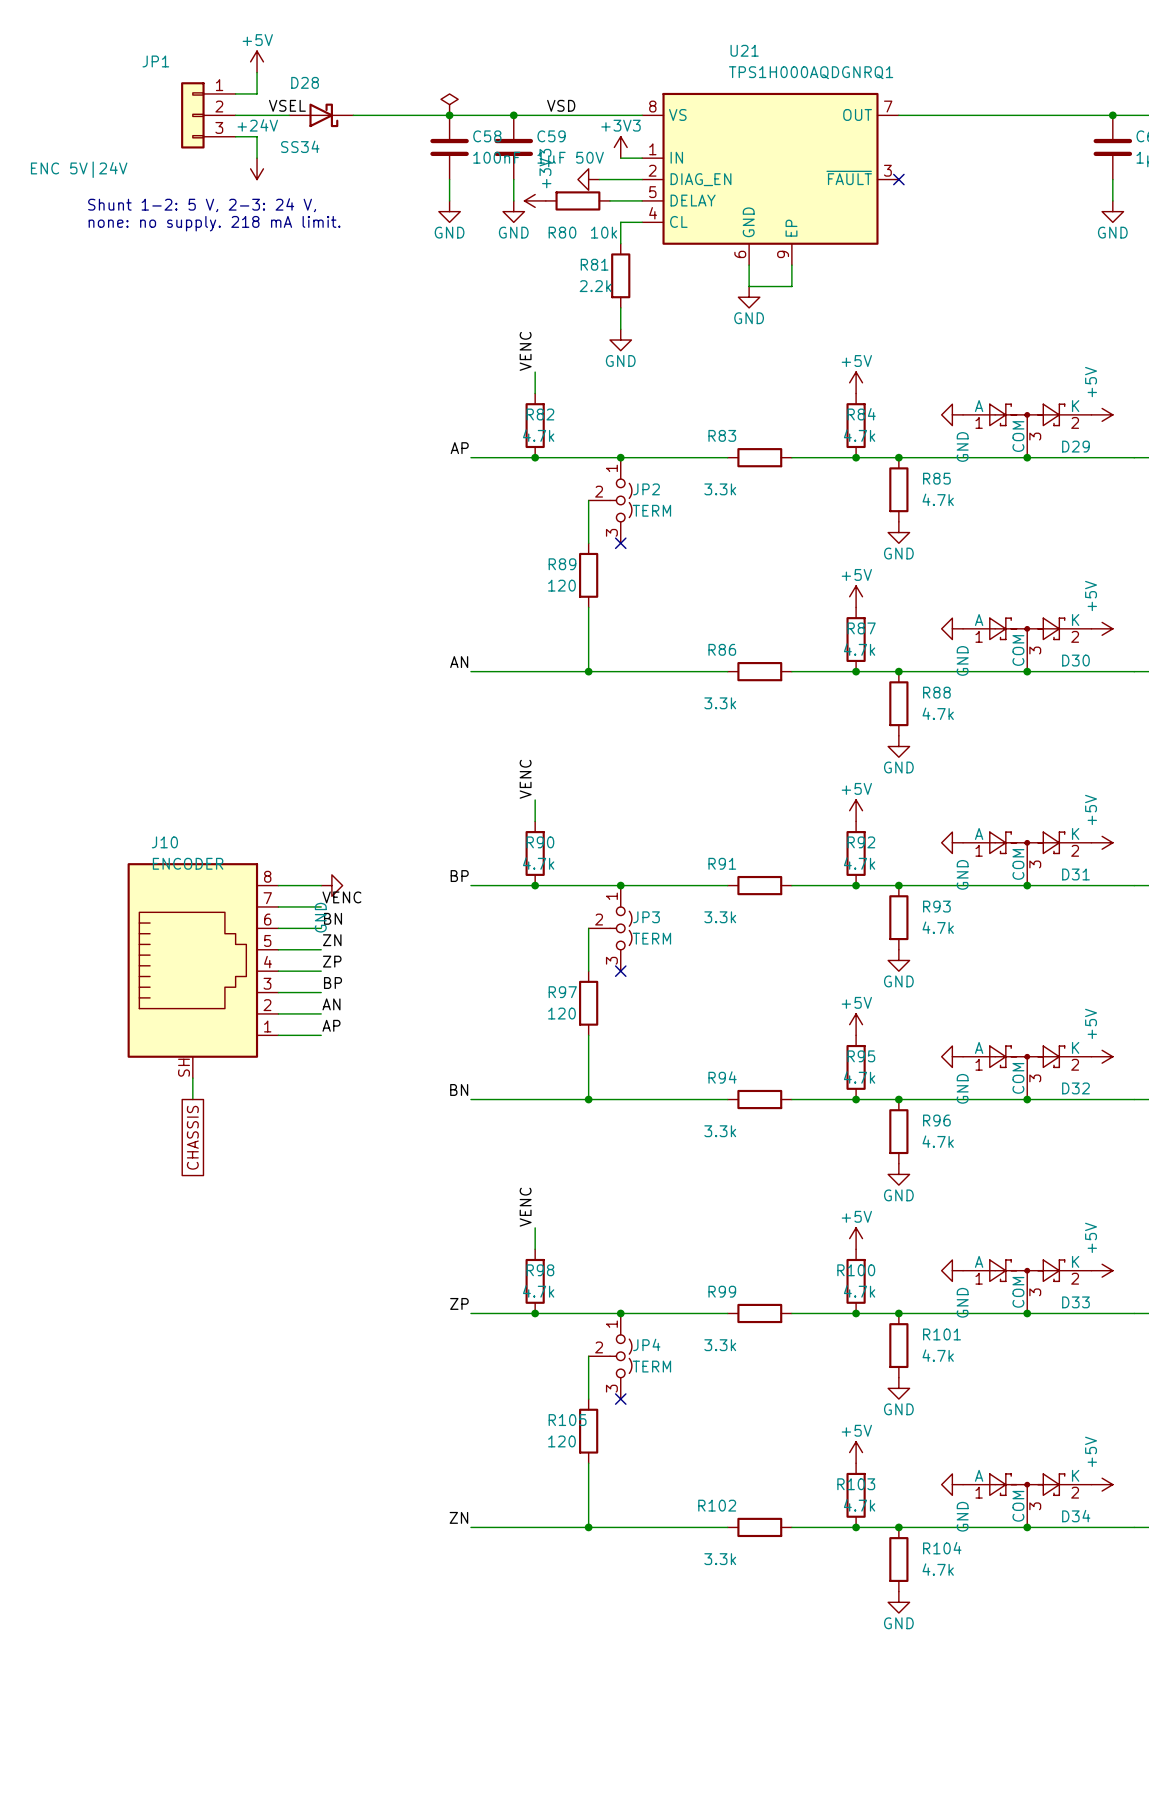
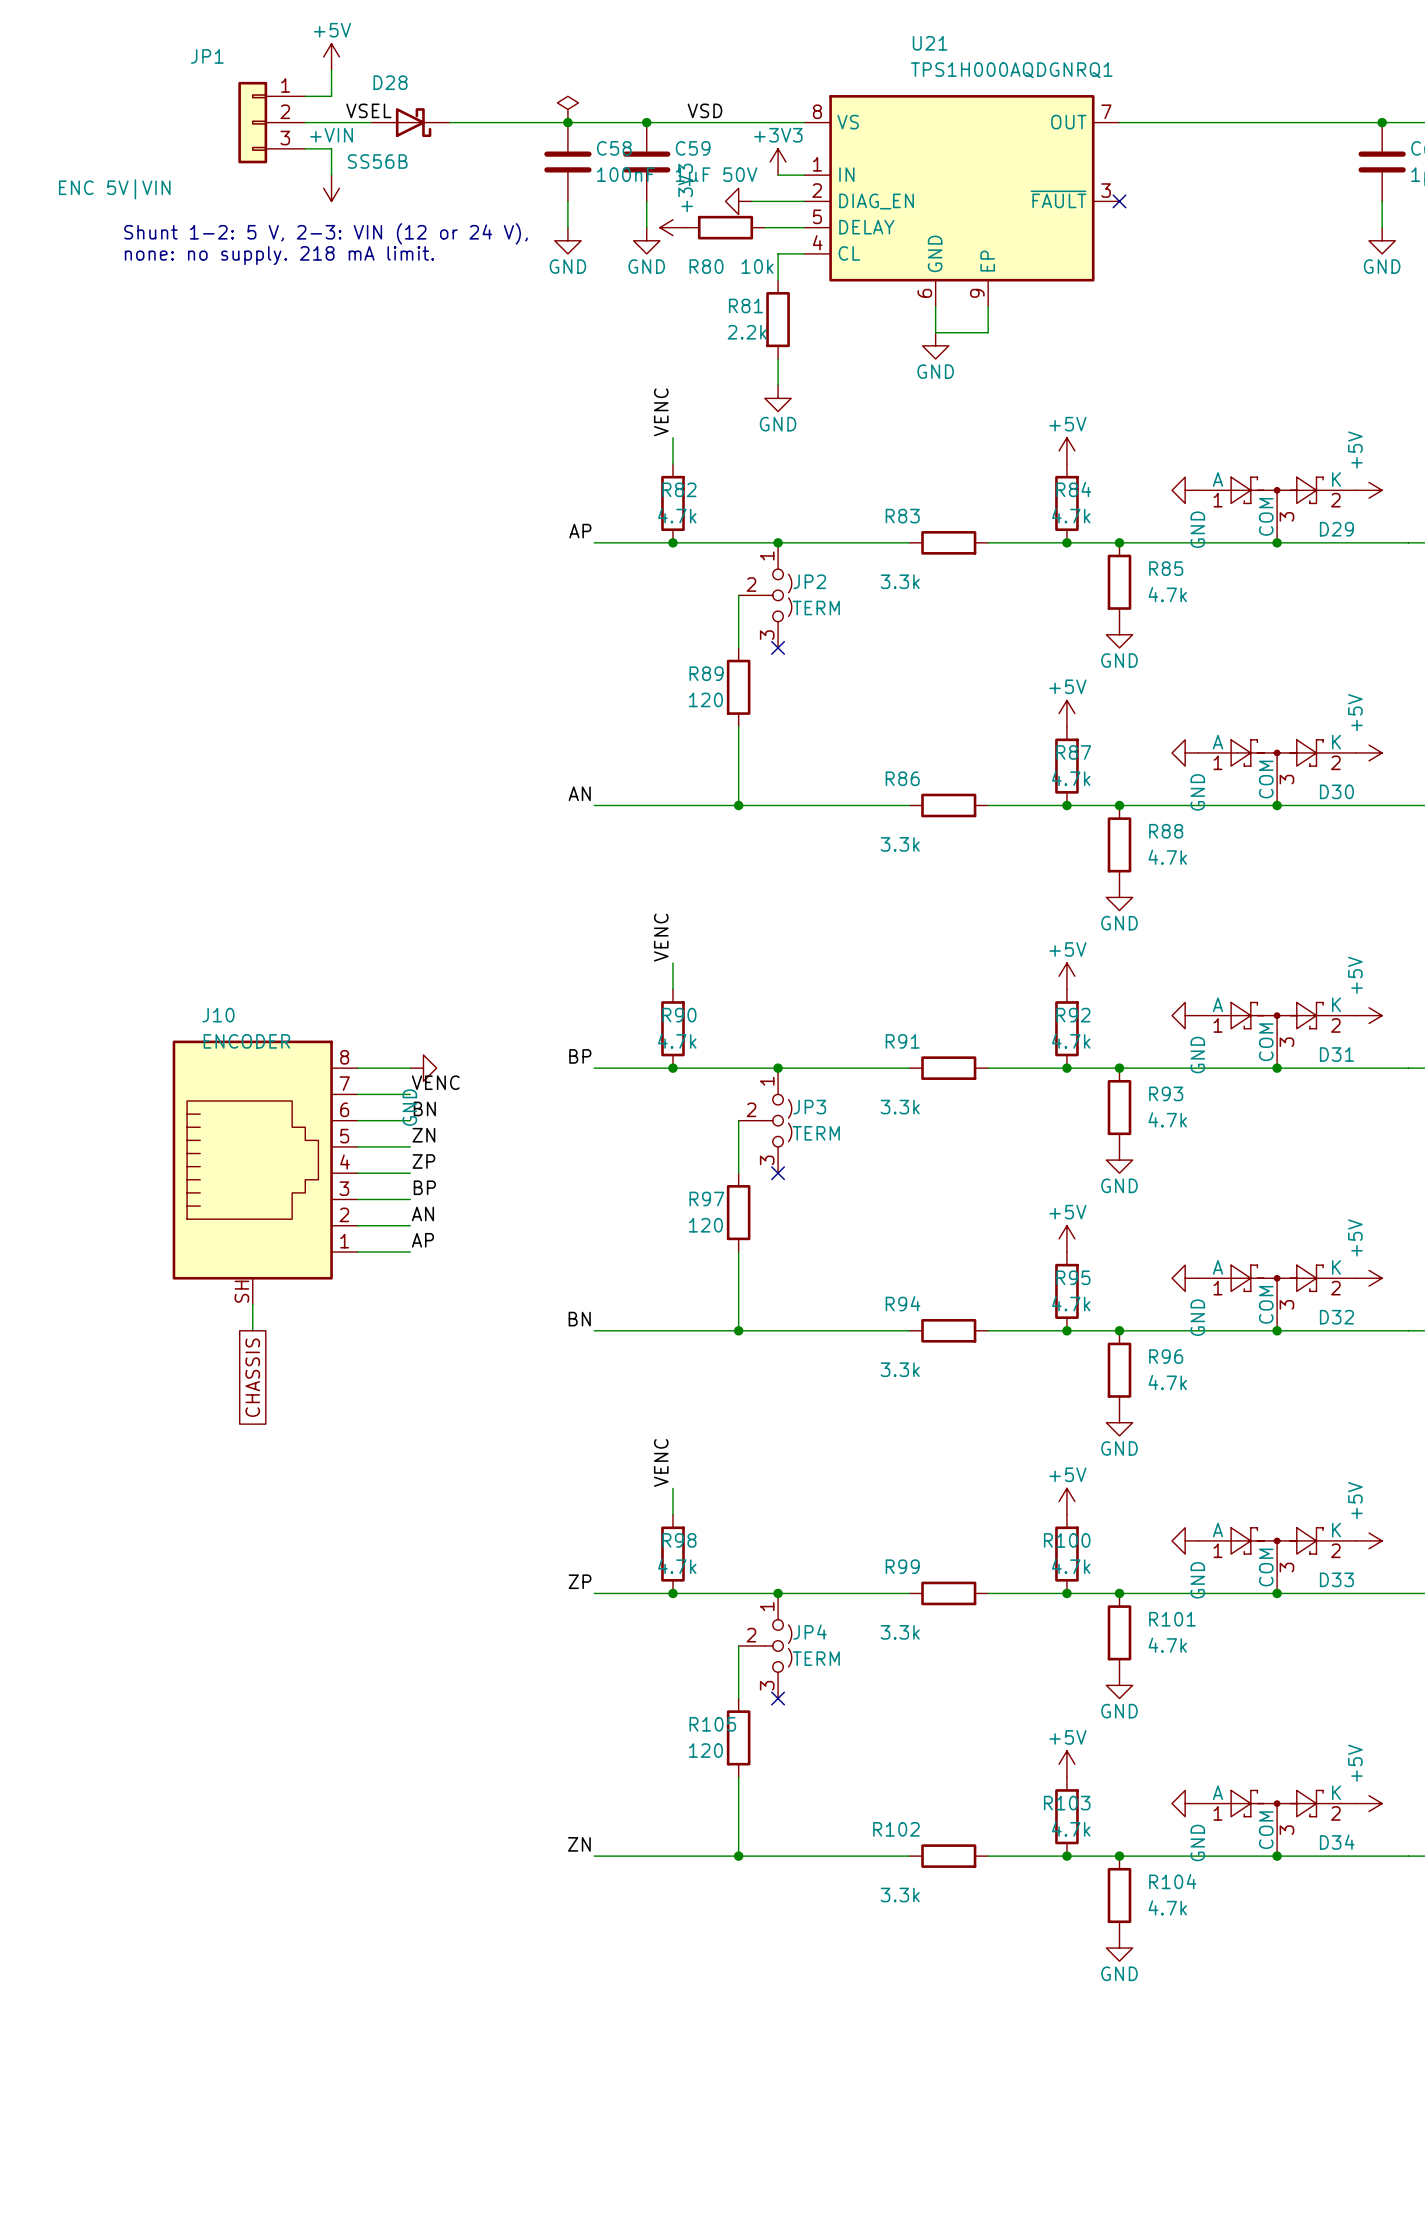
D28 value: SS34 (300, 146) -> SS56B (377, 161)
power symbol: +24V (257, 168) -> +VIN (331, 188)
JP1 value: ENC 5V|24V (79, 169) -> ENC 5V|VIN (114, 189)
text: Shunt 1-2: 5 V, 2-3: 24 V, (202, 205) -> Shunt 1-2: 5 V, 2-3: VIN (12 or 24 V), (326, 233)

